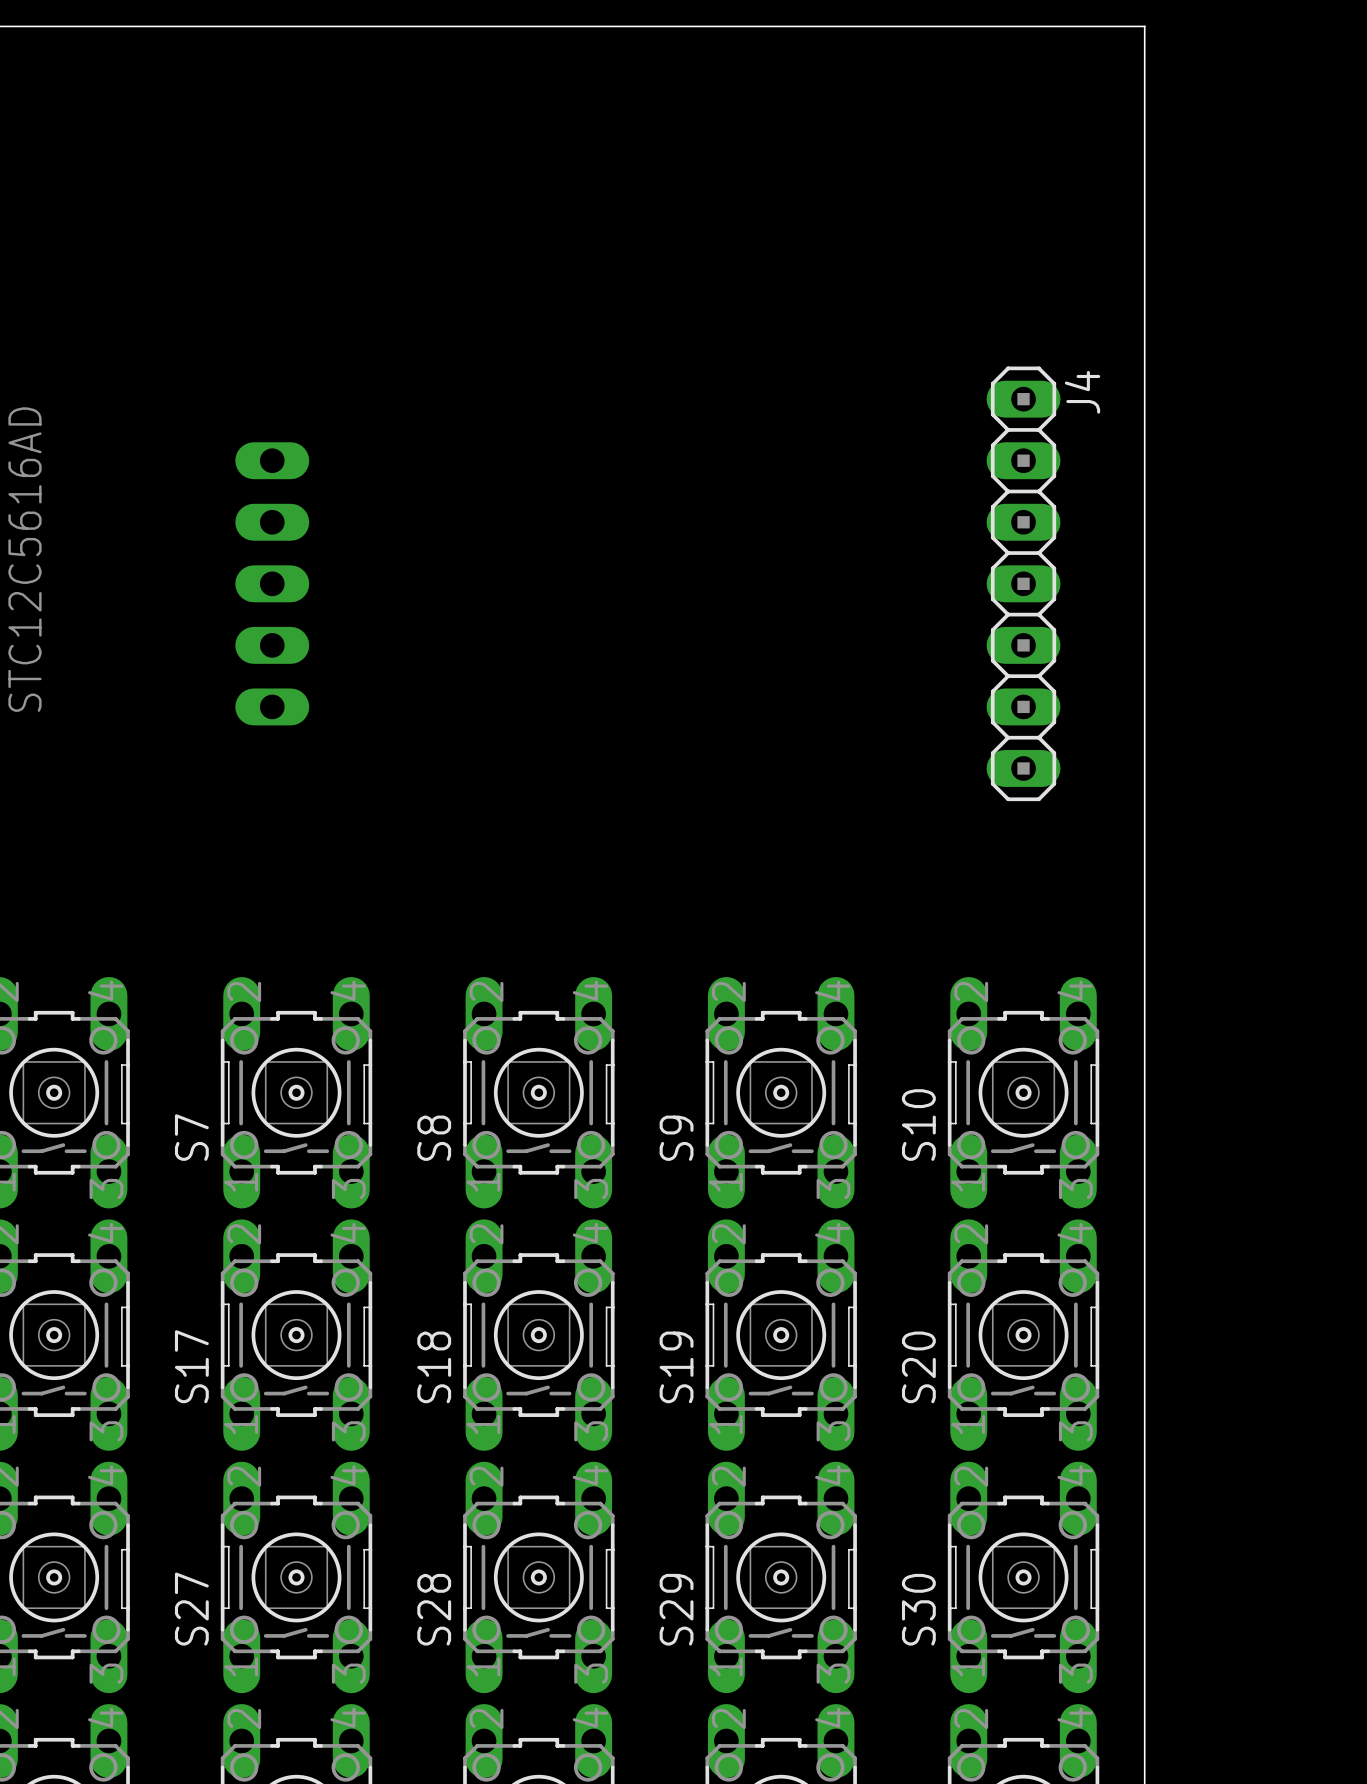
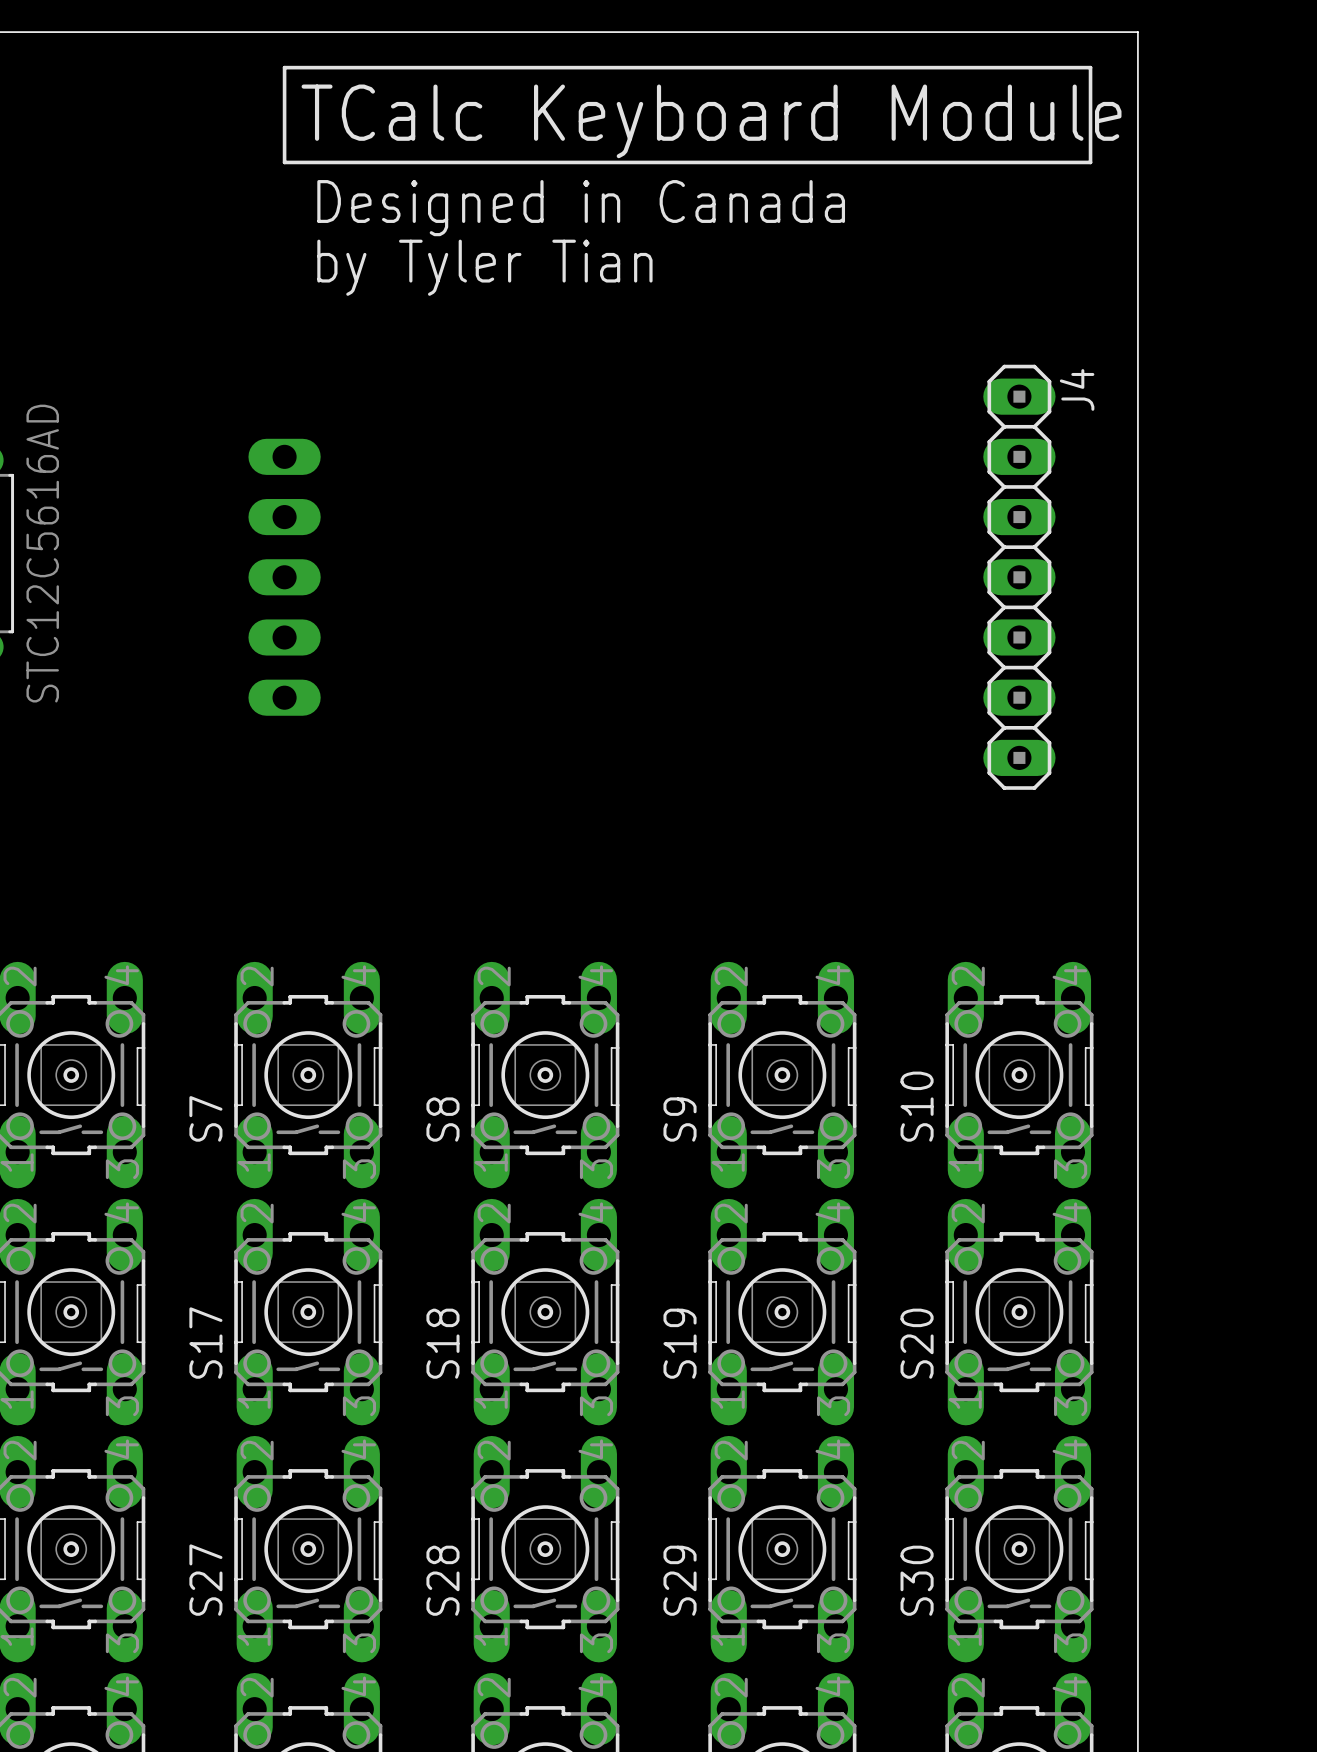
line: none -> (284, 67) (1090, 67) (1090, 162) (284, 162) (284, 67)
text: none -> TCalc Keyboard Module (711, 121)
text: none -> Designed in Canada (581, 208)
text: none -> by Tyler Tian (484, 267)

